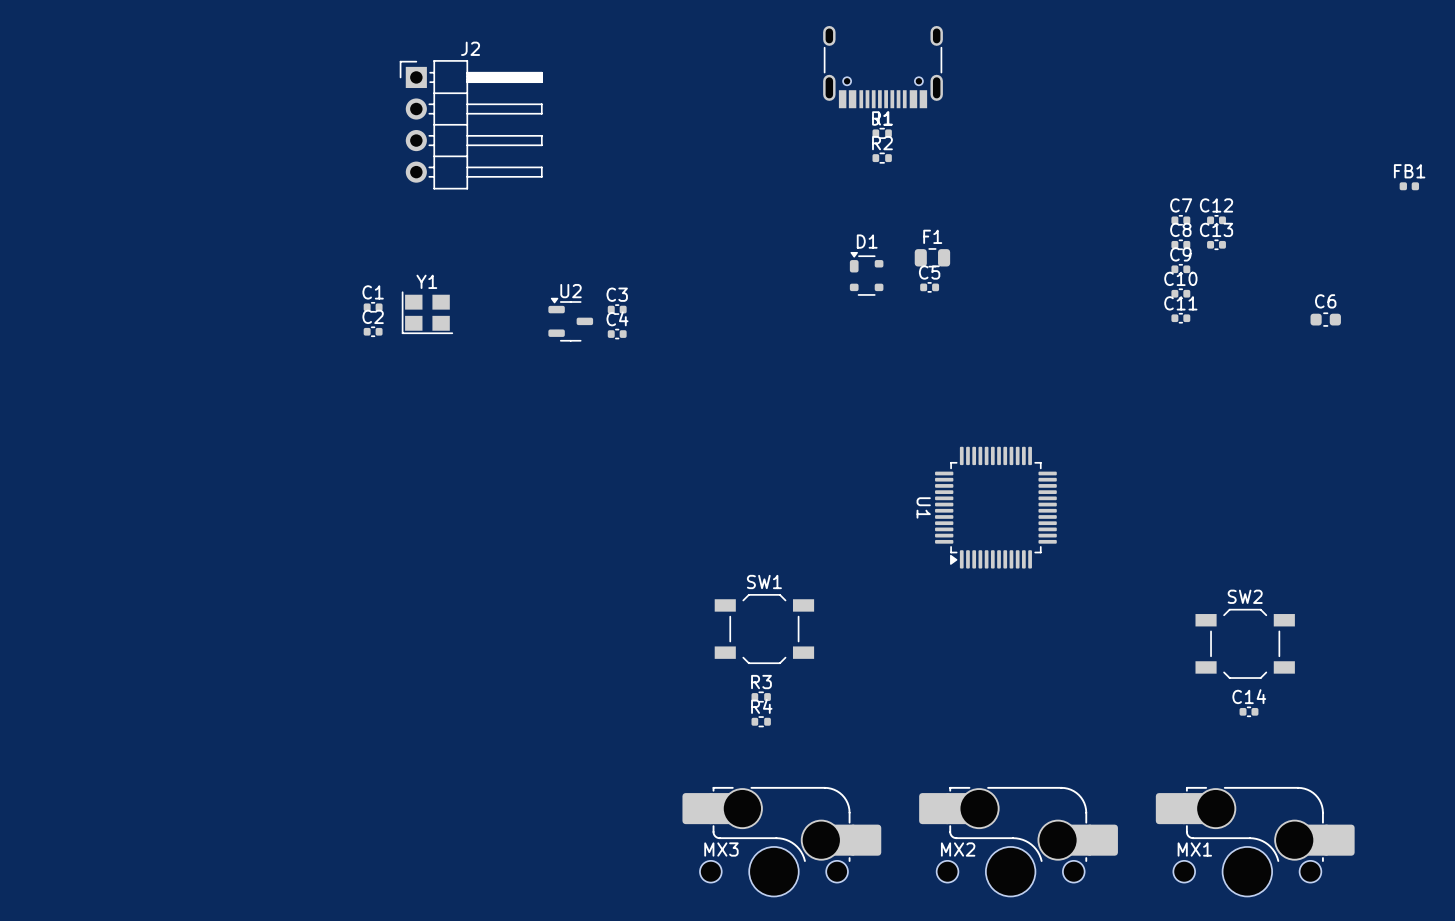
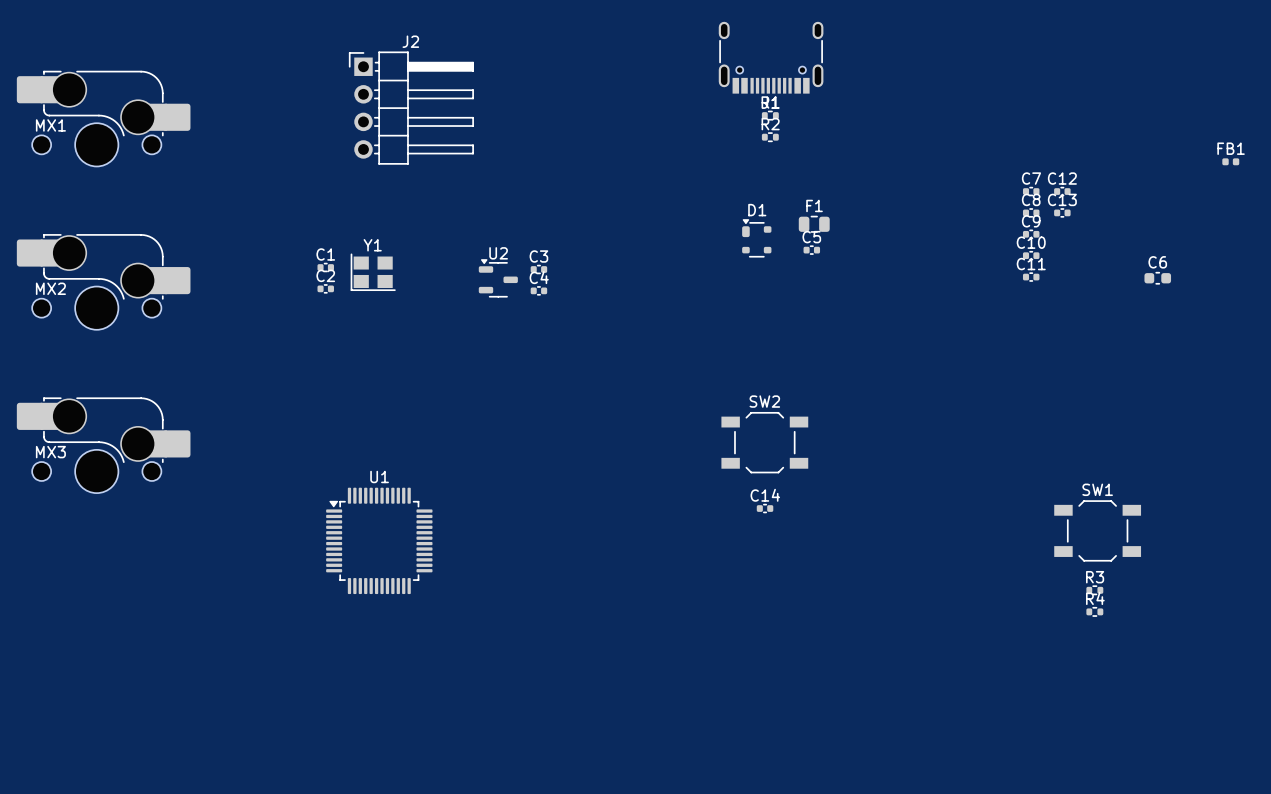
U1 rotation: 0° (995, 507) -> 90° clockwise (379, 540)
U1 position: (995, 507) -> (379, 540)
SW1 position: (764, 629) -> (1097, 530)
SW2 position: (1245, 643) -> (764, 442)
R3 position: (761, 697) -> (1094, 590)
C14 position: (1249, 711) -> (765, 508)
R4 position: (761, 721) -> (1094, 611)
MX3 position: (781, 841) -> (103, 445)
MX2 position: (1018, 841) -> (103, 281)
MX1 position: (1255, 841) -> (103, 118)

